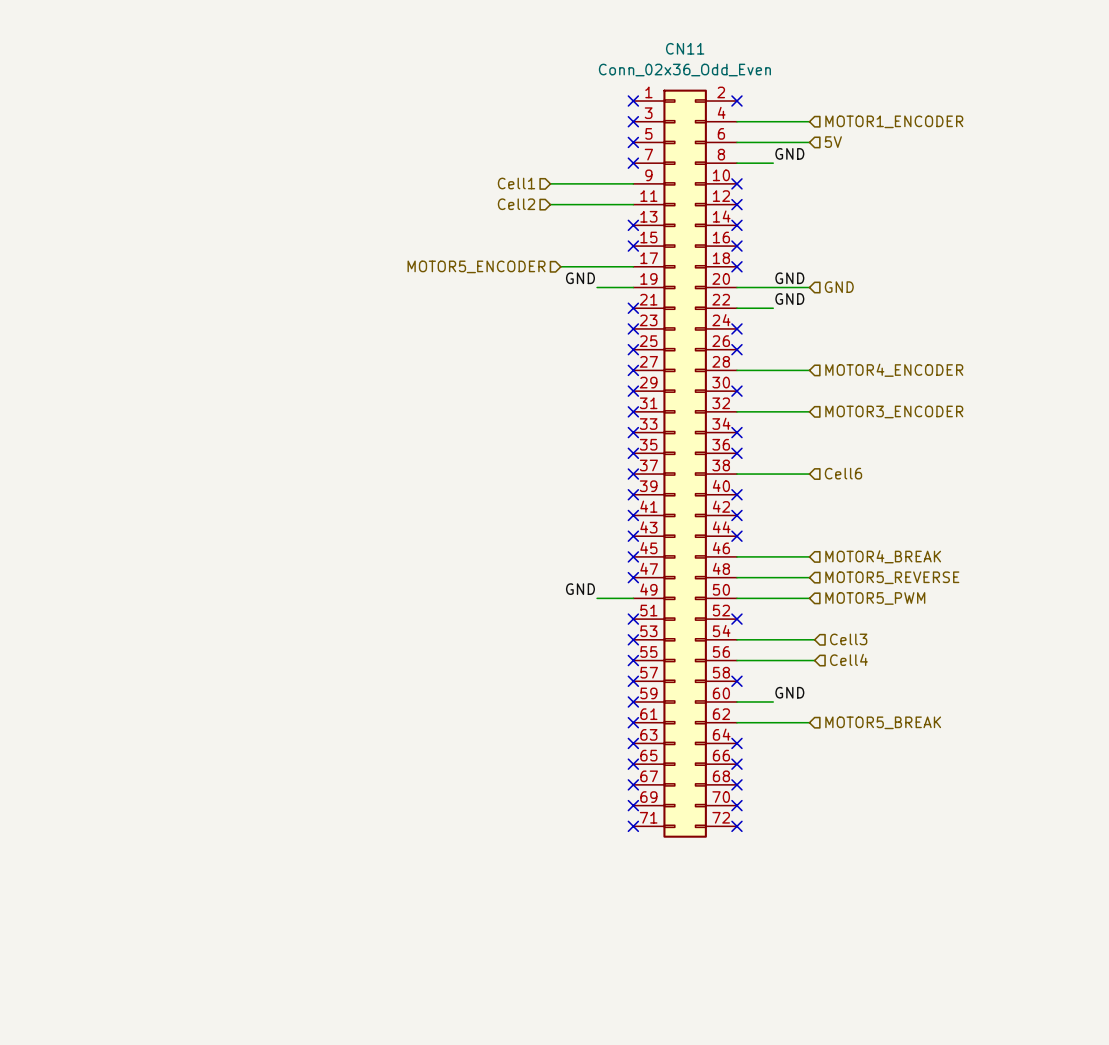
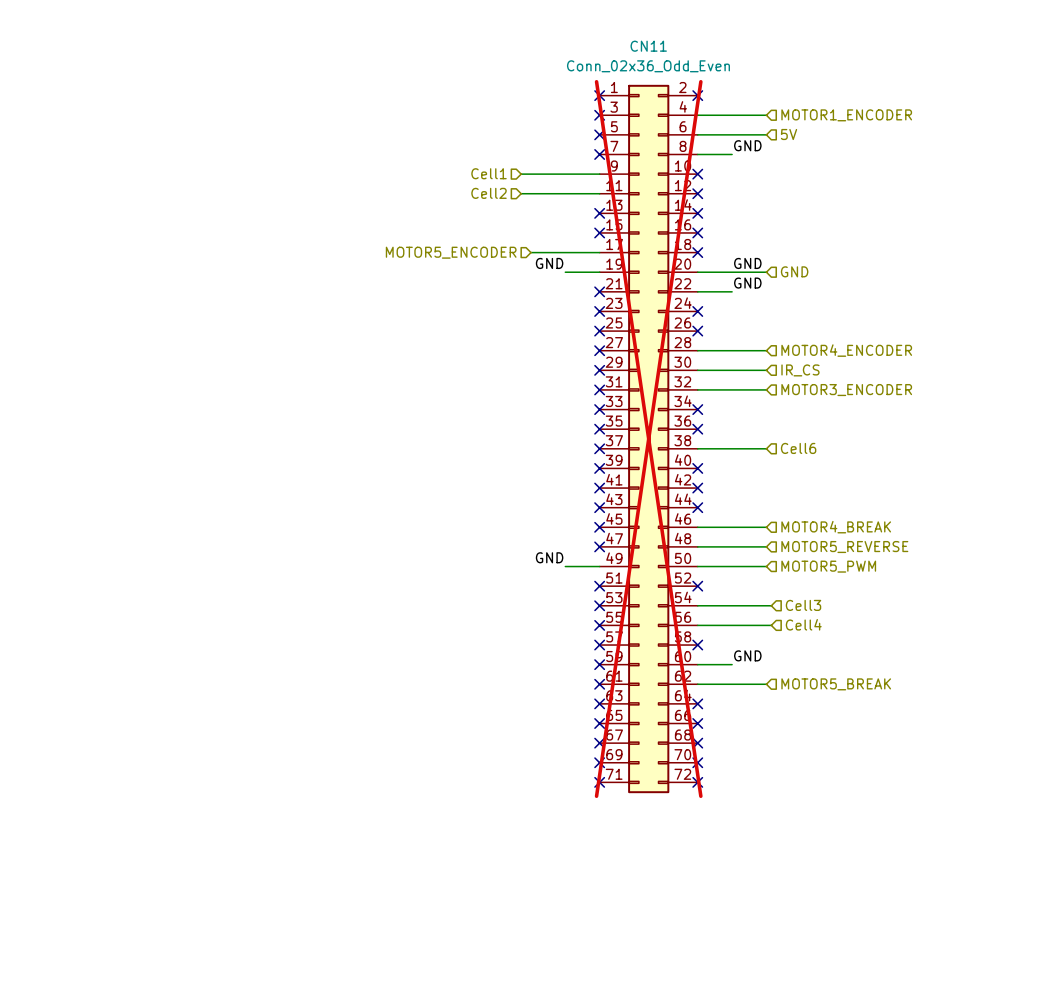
wire: none -> (697, 370) (766, 370)
no-connect mark: (736, 391) -> none
hierarchical label: none -> IR_CS (800, 370)
CN11 do-not-place cross: none -> (648, 439)

